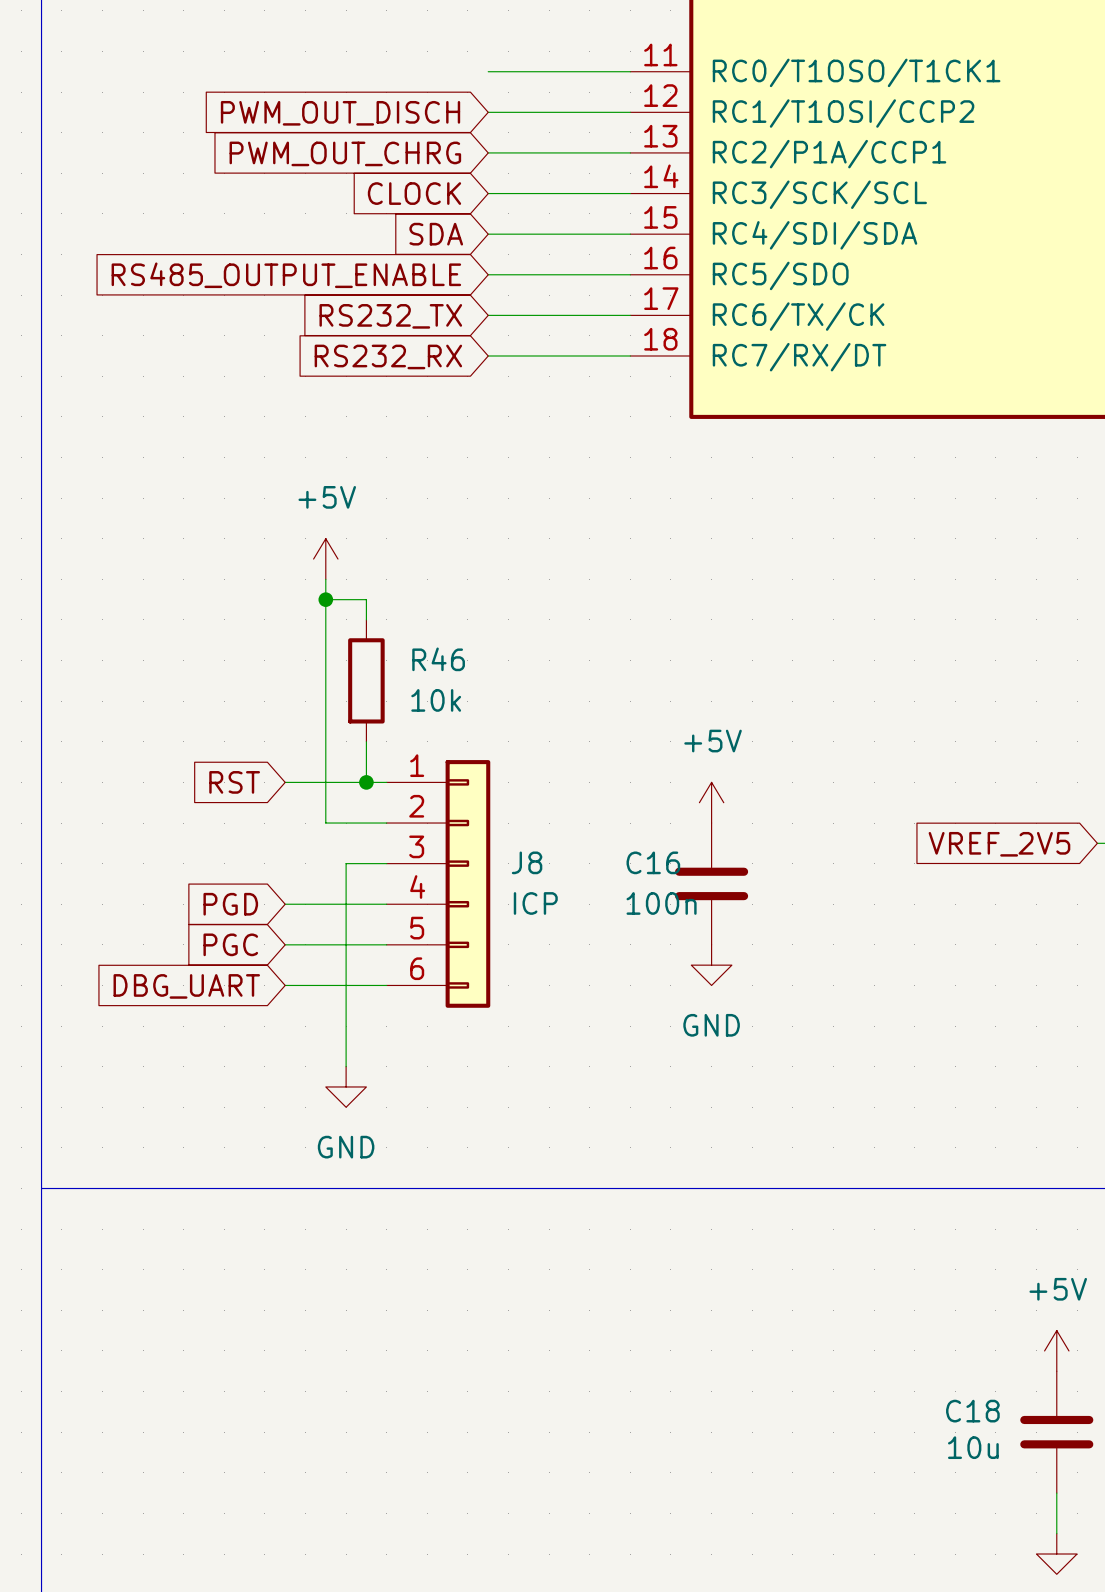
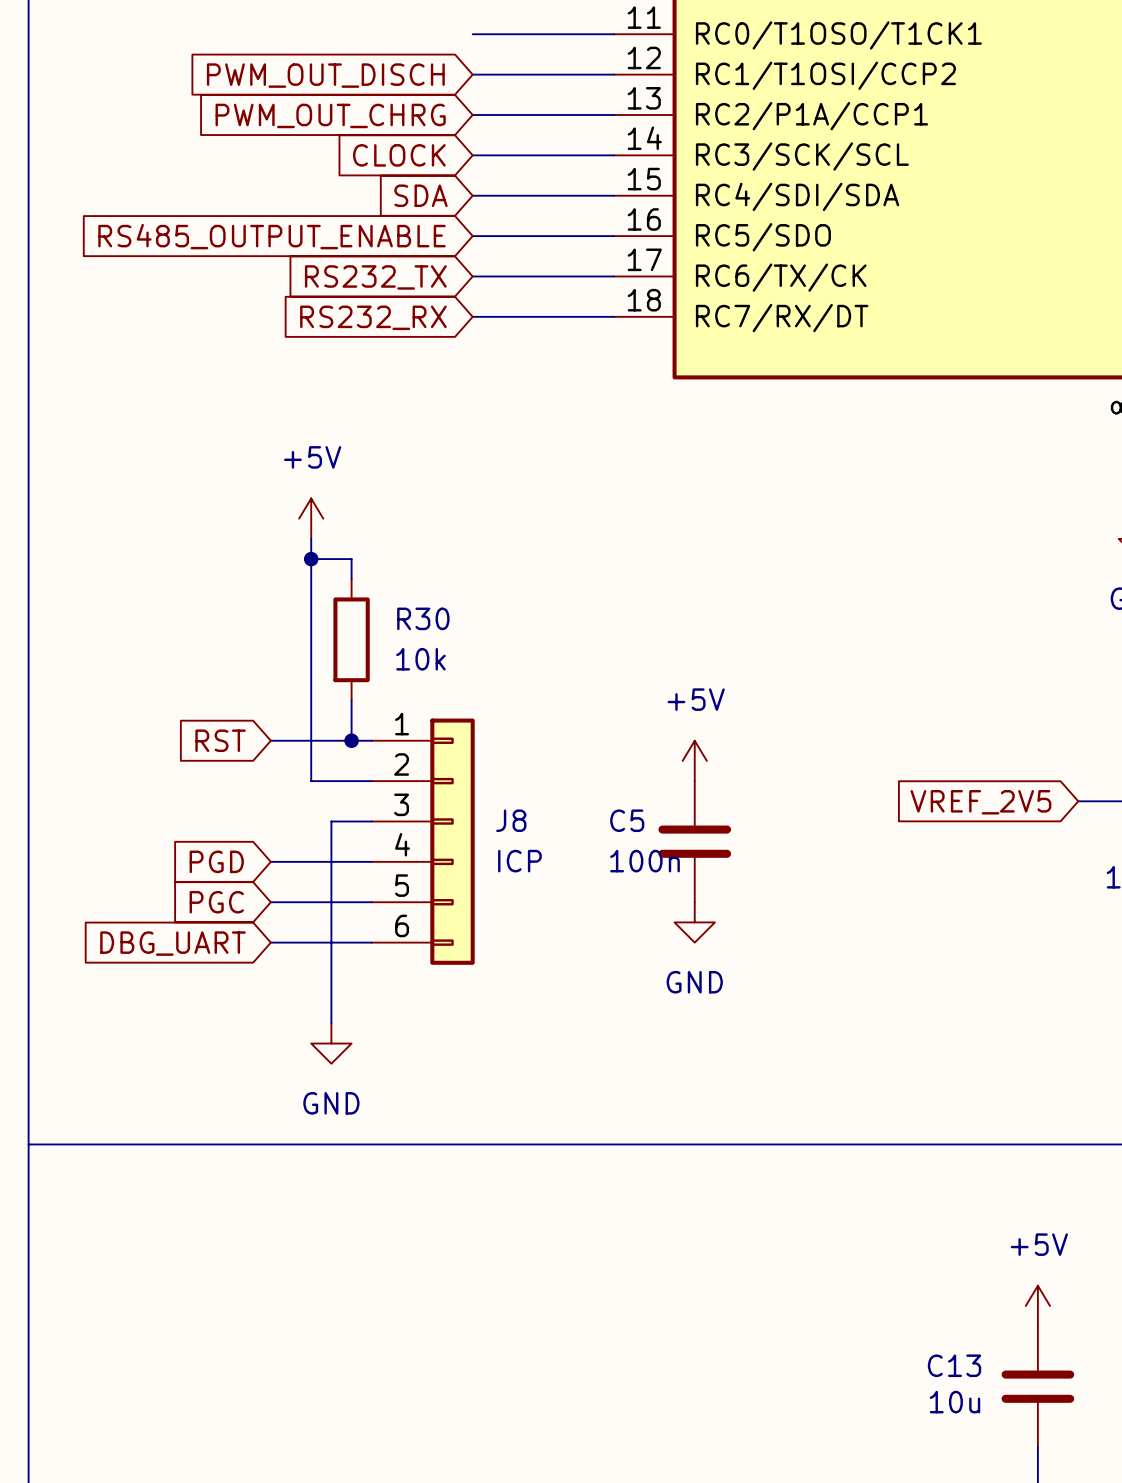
R46 name: R46 (438, 659) -> R30 (423, 618)
C16 name: C16 (653, 862) -> C5 (627, 820)
C18 name: C18 (972, 1411) -> C13 (954, 1365)

